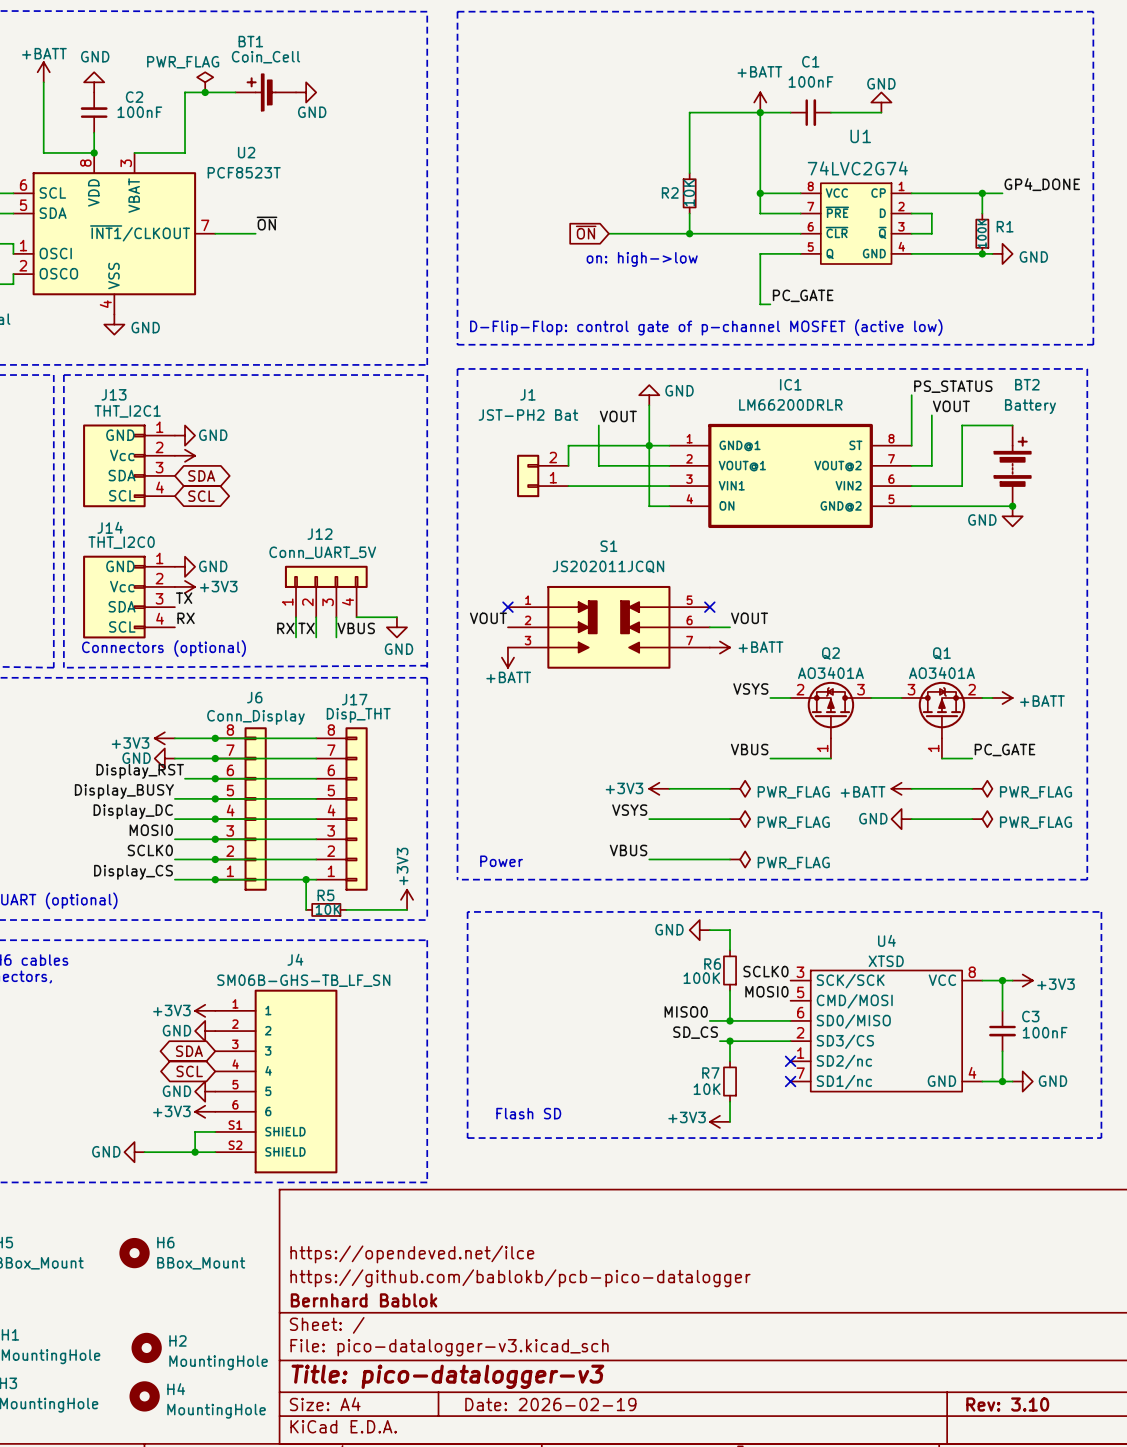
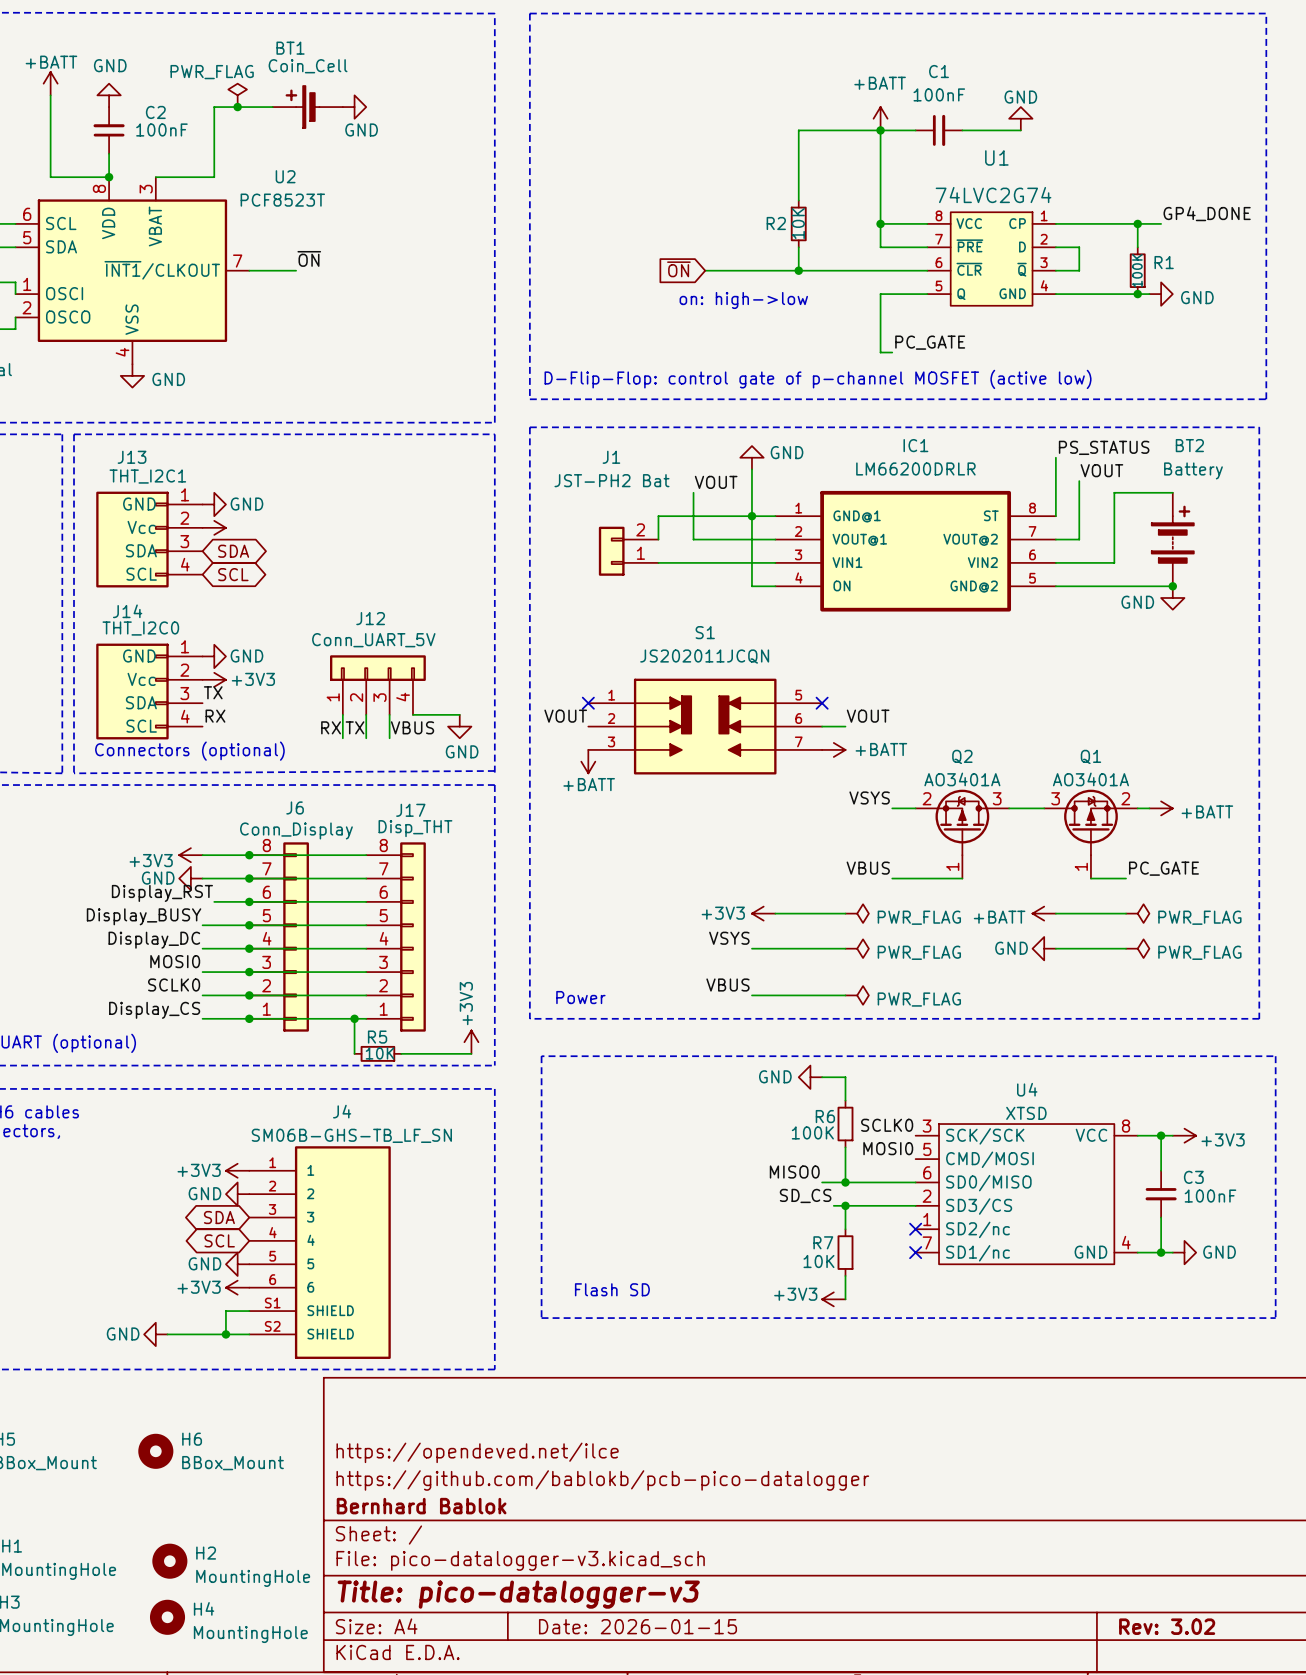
title block: Date: 2026-02-19 (550, 1404) -> Date: 2026-01-15 (637, 1626)
title block: Rev: 3.10 (1007, 1404) -> Rev: 3.02 (1167, 1626)

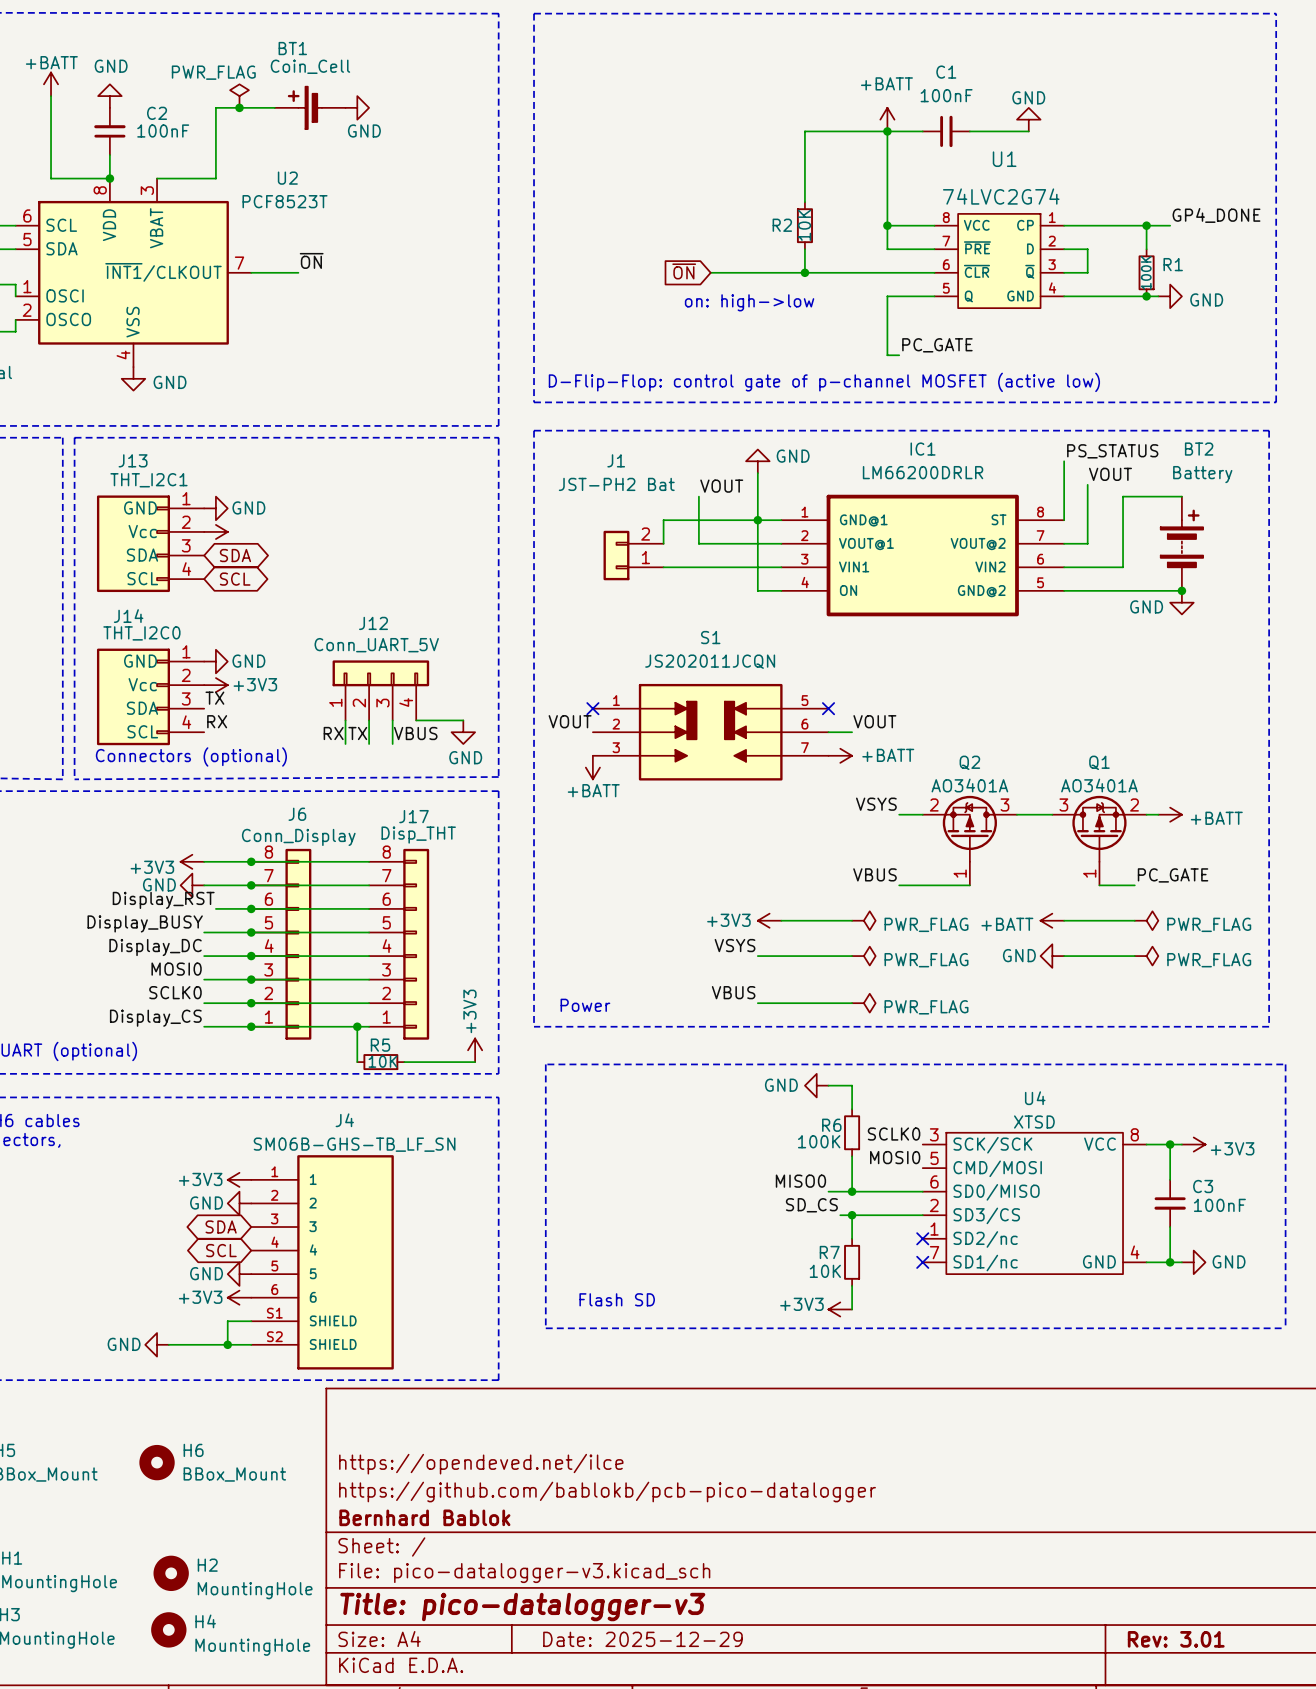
title block: Date: 2026-01-15 (637, 1626) -> Date: 2025-12-29 (642, 1639)
title block: Rev: 3.02 (1167, 1626) -> Rev: 3.01 (1176, 1639)

